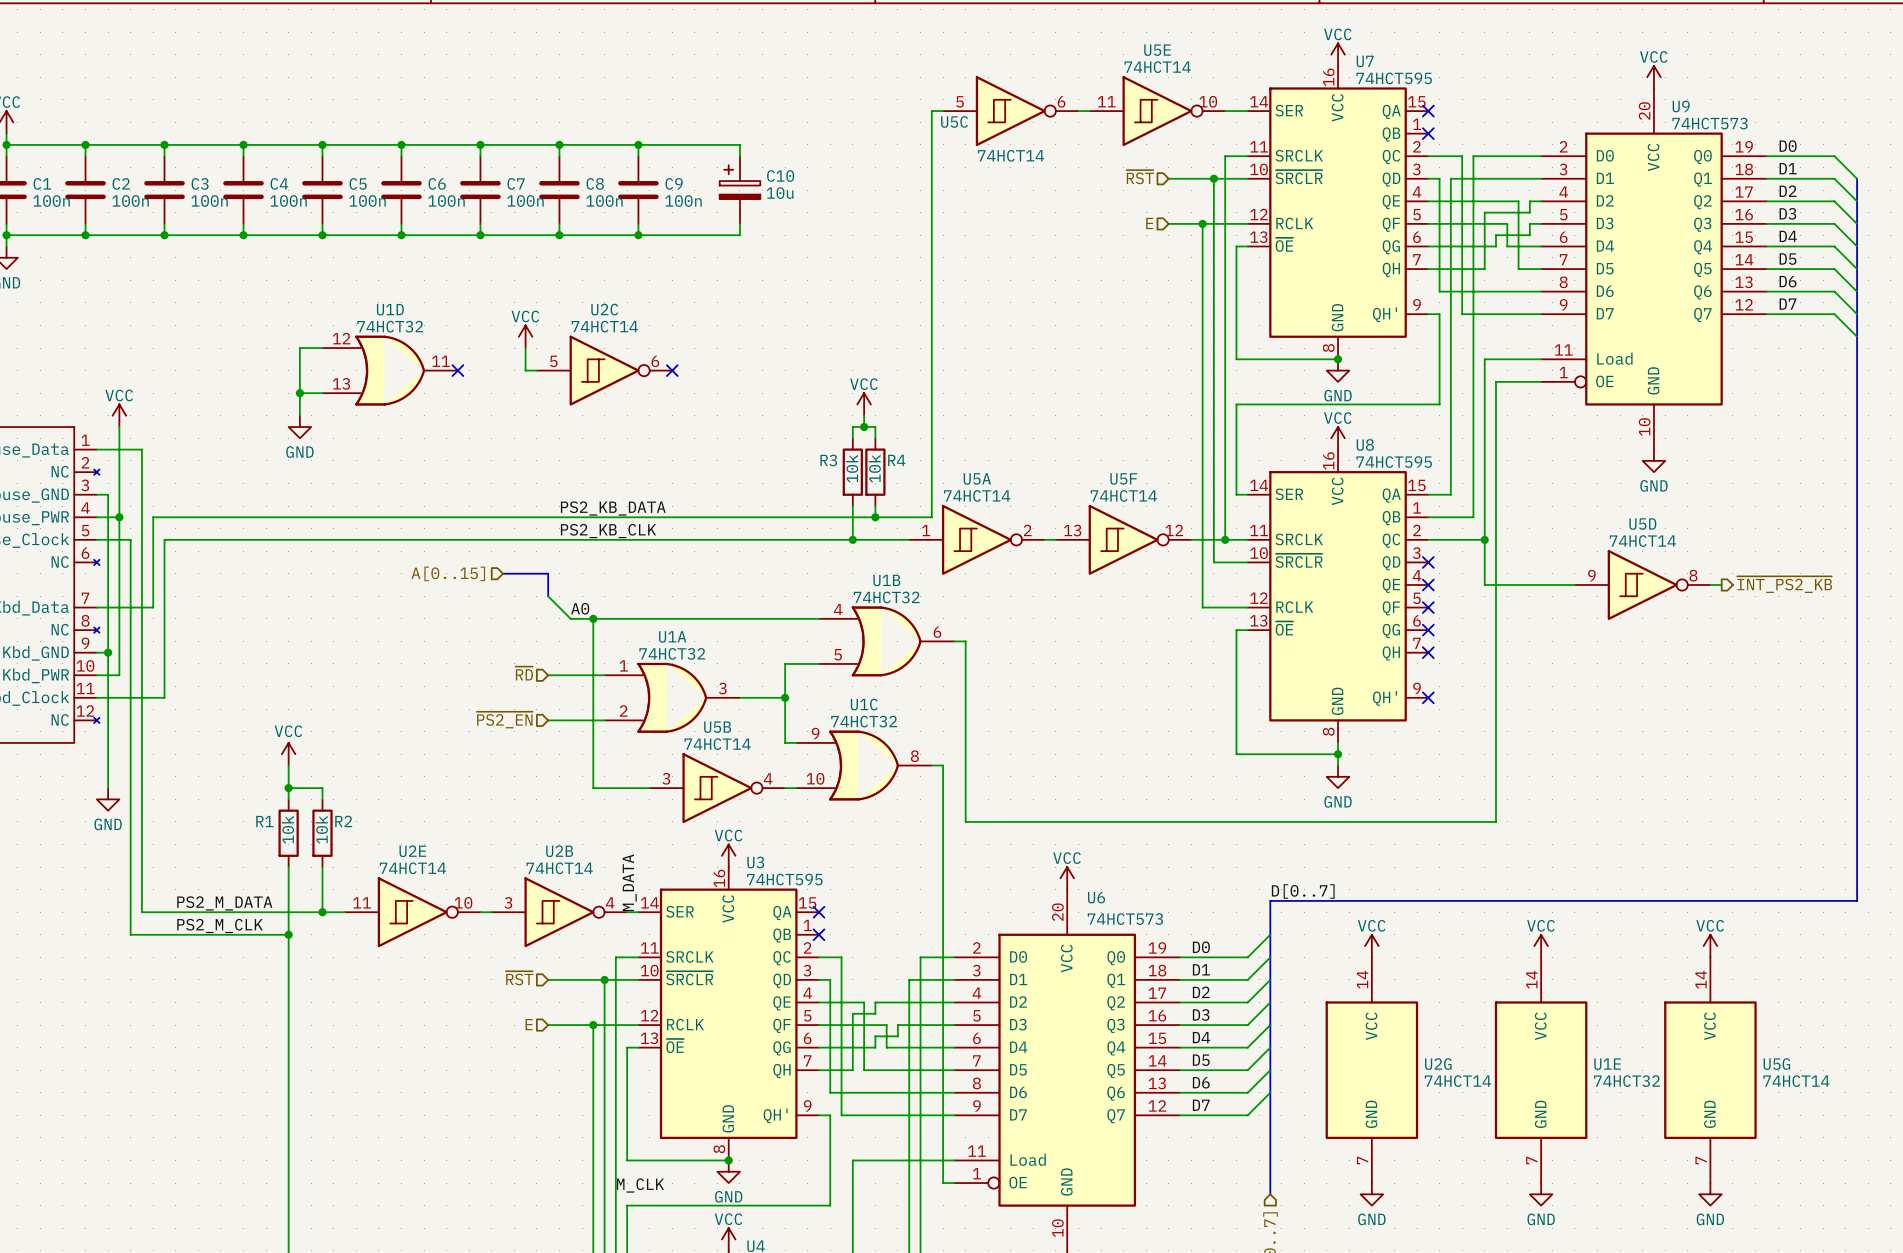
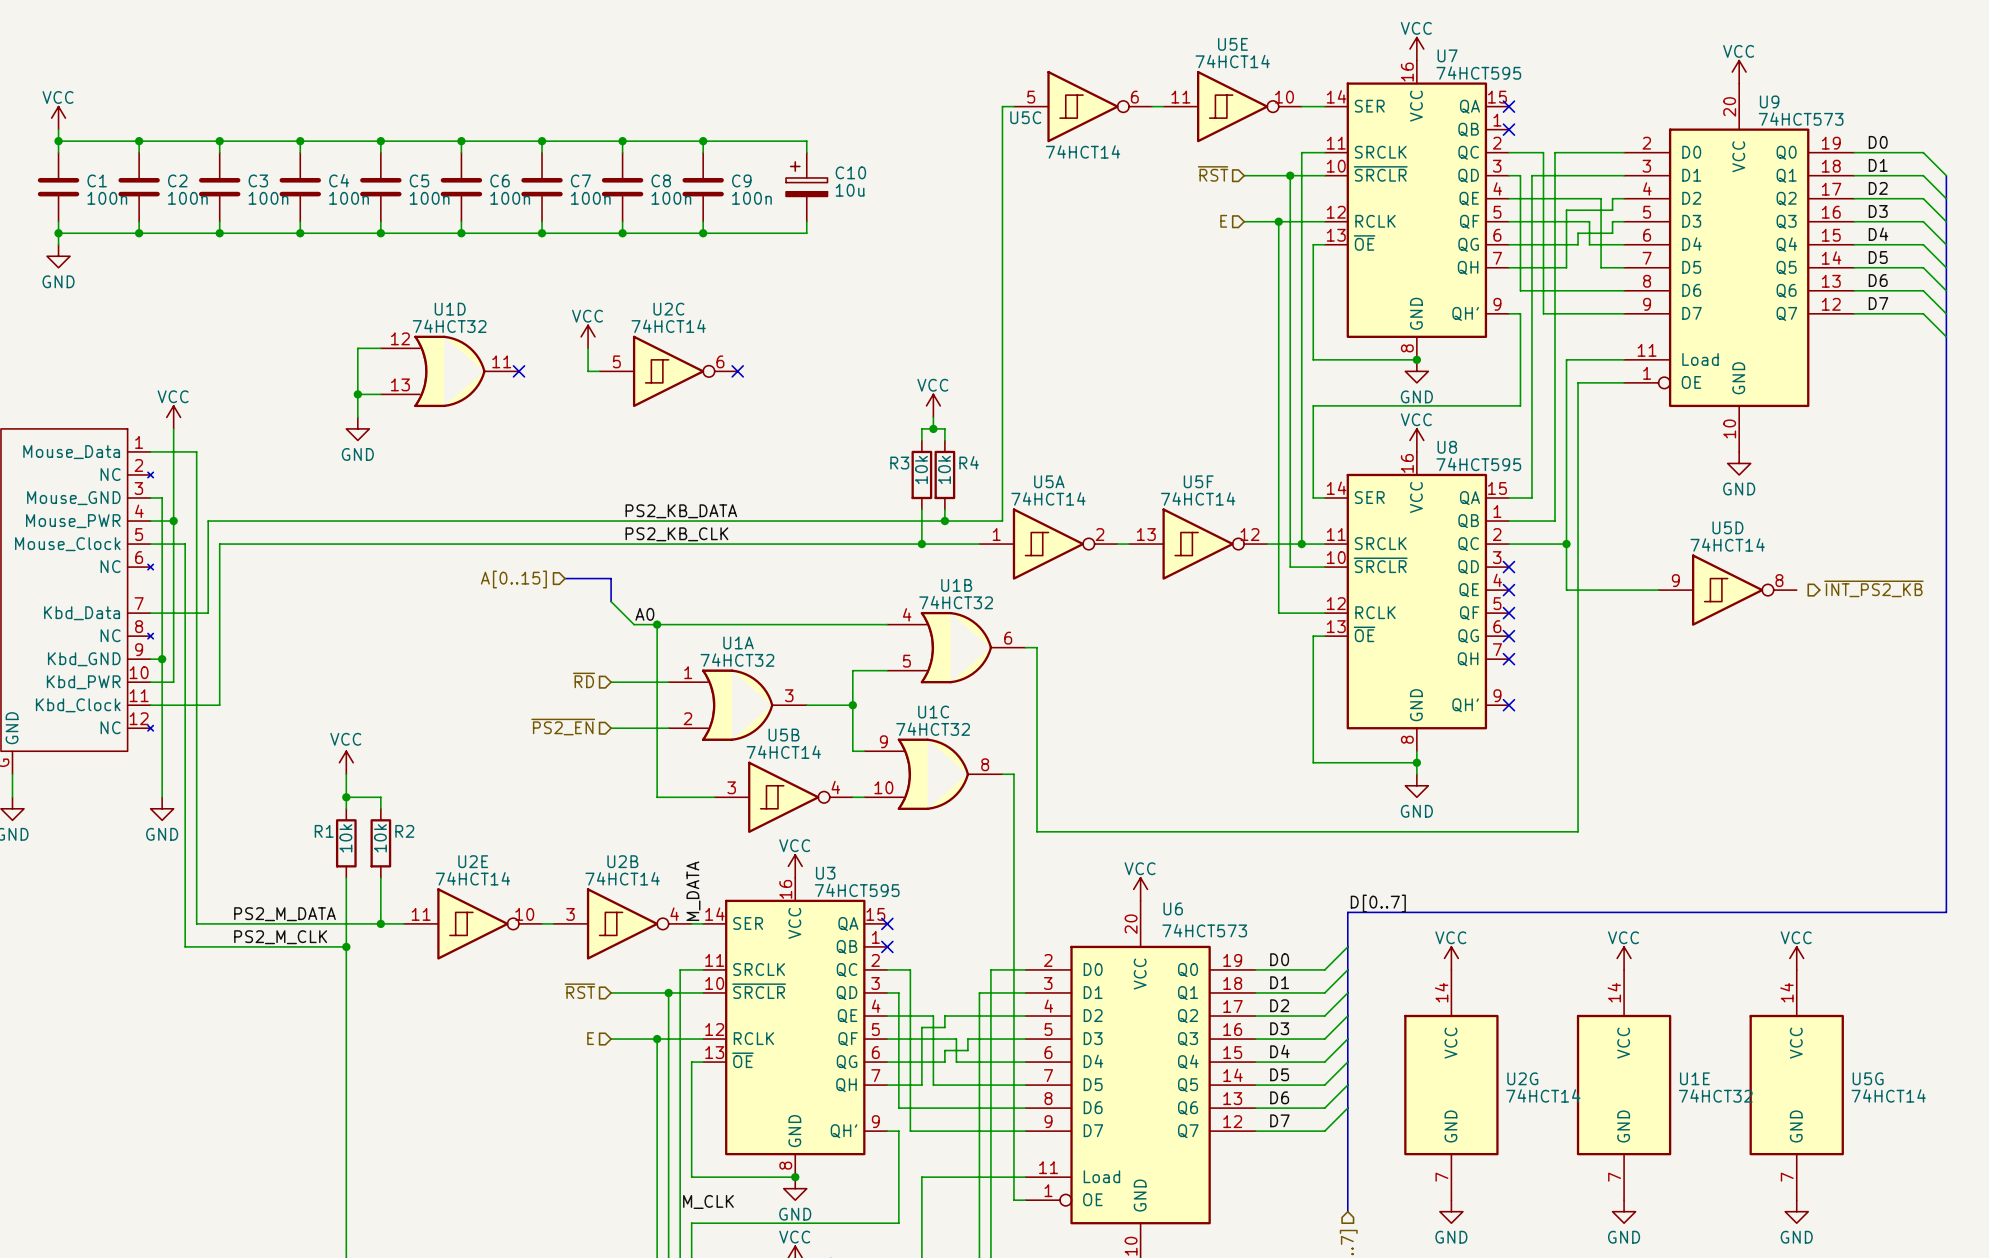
wire: (1710, 584) (1721, 584) -> none

